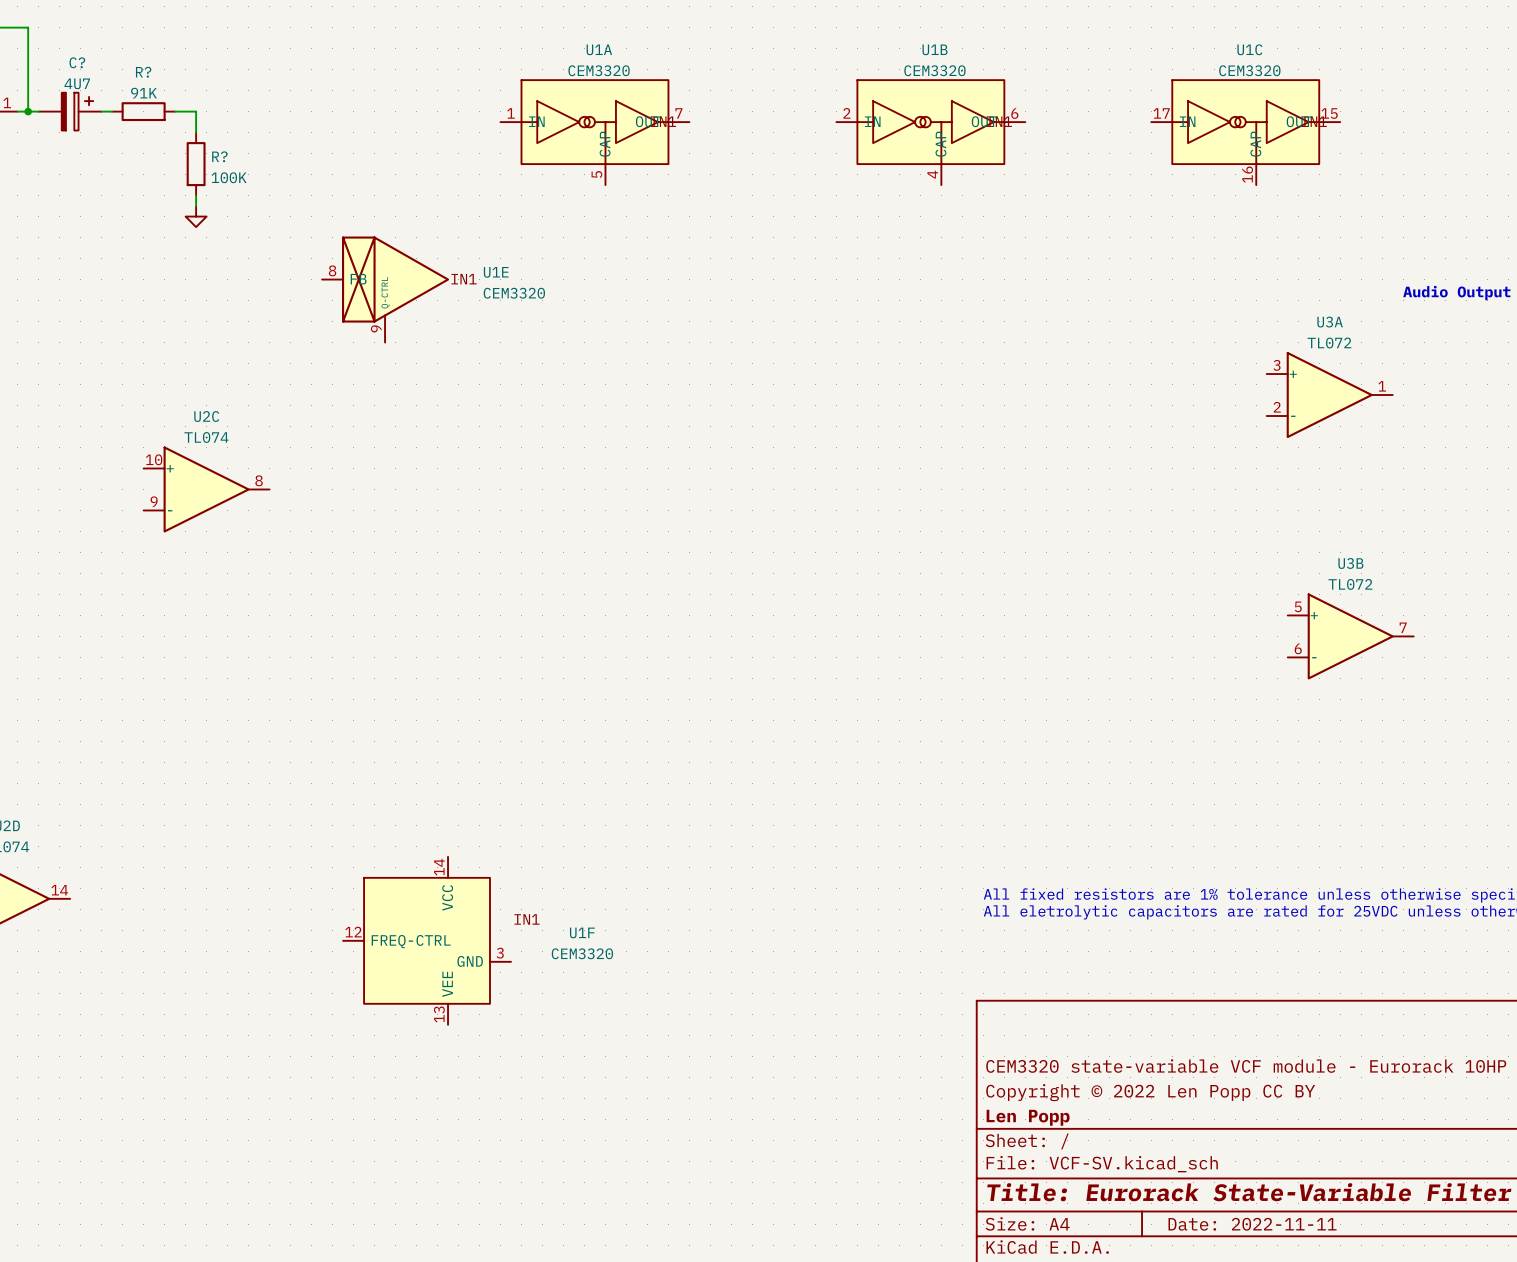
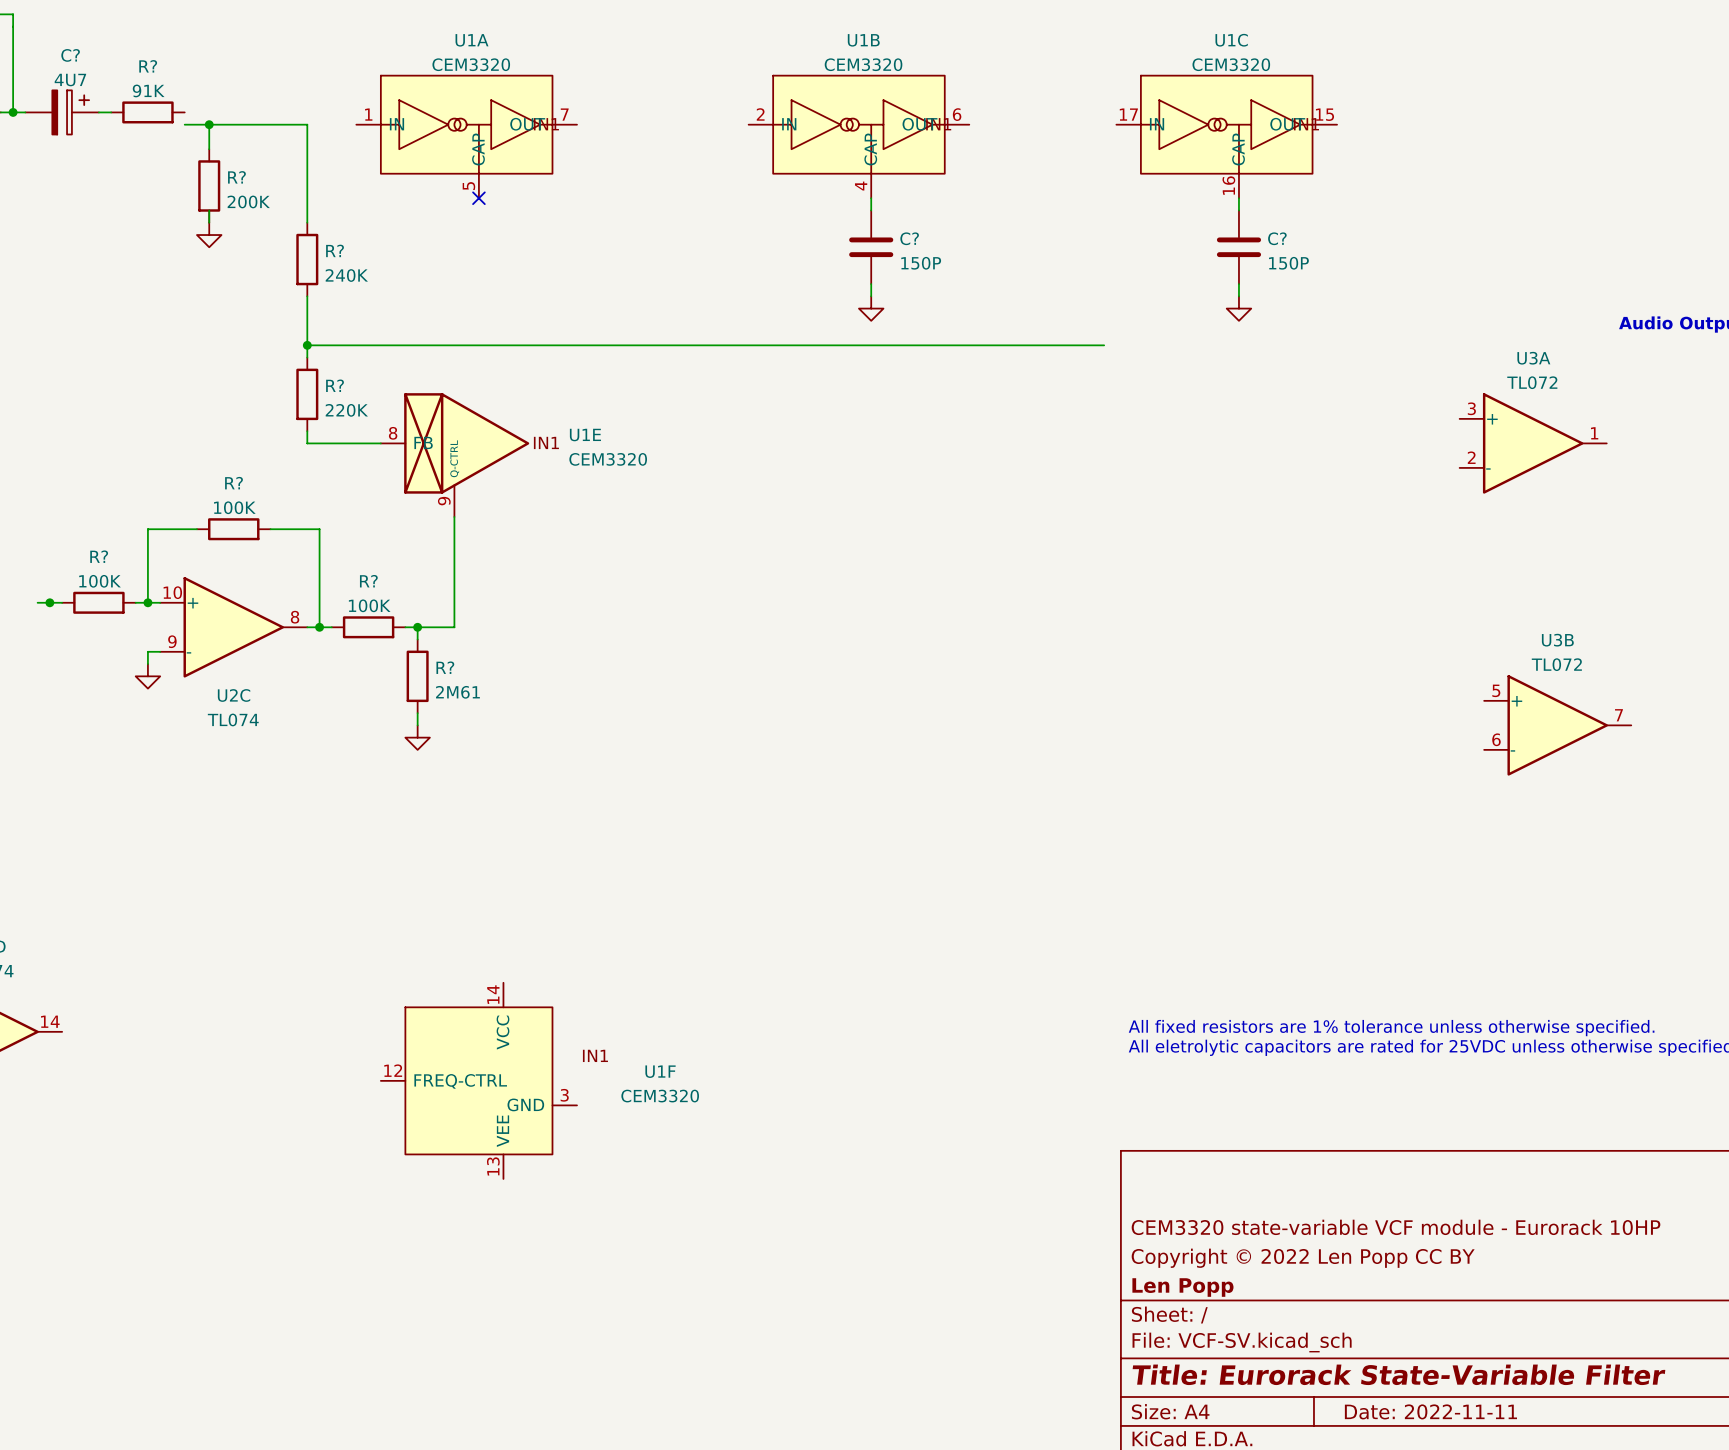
wire: (175, 111) (196, 111) (196, 122) -> none
wire: none -> (184, 124) (307, 124) (307, 222)
junction: none -> (209, 124)
U1A position: (594, 132) -> (466, 136)
U1B position: (930, 132) -> (858, 136)
U1C position: (1245, 132) -> (1226, 136)
R?: 100K (196, 164) -> none
R?: none -> 200K (209, 185)
no-connect mark: none -> (478, 198)
wire: none -> (871, 198) (871, 210)
wire: none -> (1238, 198) (1238, 210)
C?: none -> 150P (871, 247)
C?: none -> 150P (1238, 247)
R?: none -> 240K (307, 259)
wire: none -> (871, 284) (871, 296)
wire: none -> (1238, 284) (1238, 296)
wire: none -> (307, 296) (307, 357)
power symbol: none -> (871, 308)
power symbol: none -> (1238, 308)
U1E position: (385, 289) -> (455, 455)
wire: none -> (307, 345) (1104, 345)
junction: none -> (307, 345)
R?: none -> 220K (307, 394)
wire: none -> (307, 431) (307, 443) (380, 443)
U2C name position: U2C (206, 416) -> U2C (234, 695)
U2C value position: TL074 (206, 437) -> TL074 (233, 719)
wire: none -> (454, 516) (454, 627) (405, 627)
wire: none -> (196, 529) (147, 529) (147, 602)
R?: none -> 100K (233, 529)
wire: none -> (270, 529) (319, 529) (319, 627)
U2C position: (206, 489) -> (233, 627)
wire: none -> (37, 602) (62, 602)
junction: none -> (49, 602)
R?: none -> 100K (98, 602)
wire: none -> (135, 602) (160, 602)
junction: none -> (147, 602)
wire: none -> (307, 627) (331, 627)
junction: none -> (319, 627)
R?: none -> 100K (368, 627)
wire: none -> (417, 627) (417, 639)
junction: none -> (417, 627)
wire: none -> (160, 651) (147, 651) (147, 664)
power symbol: none -> (147, 676)
R?: none -> 2M61 (417, 676)
wire: none -> (417, 713) (417, 725)
power symbol: none -> (417, 737)

